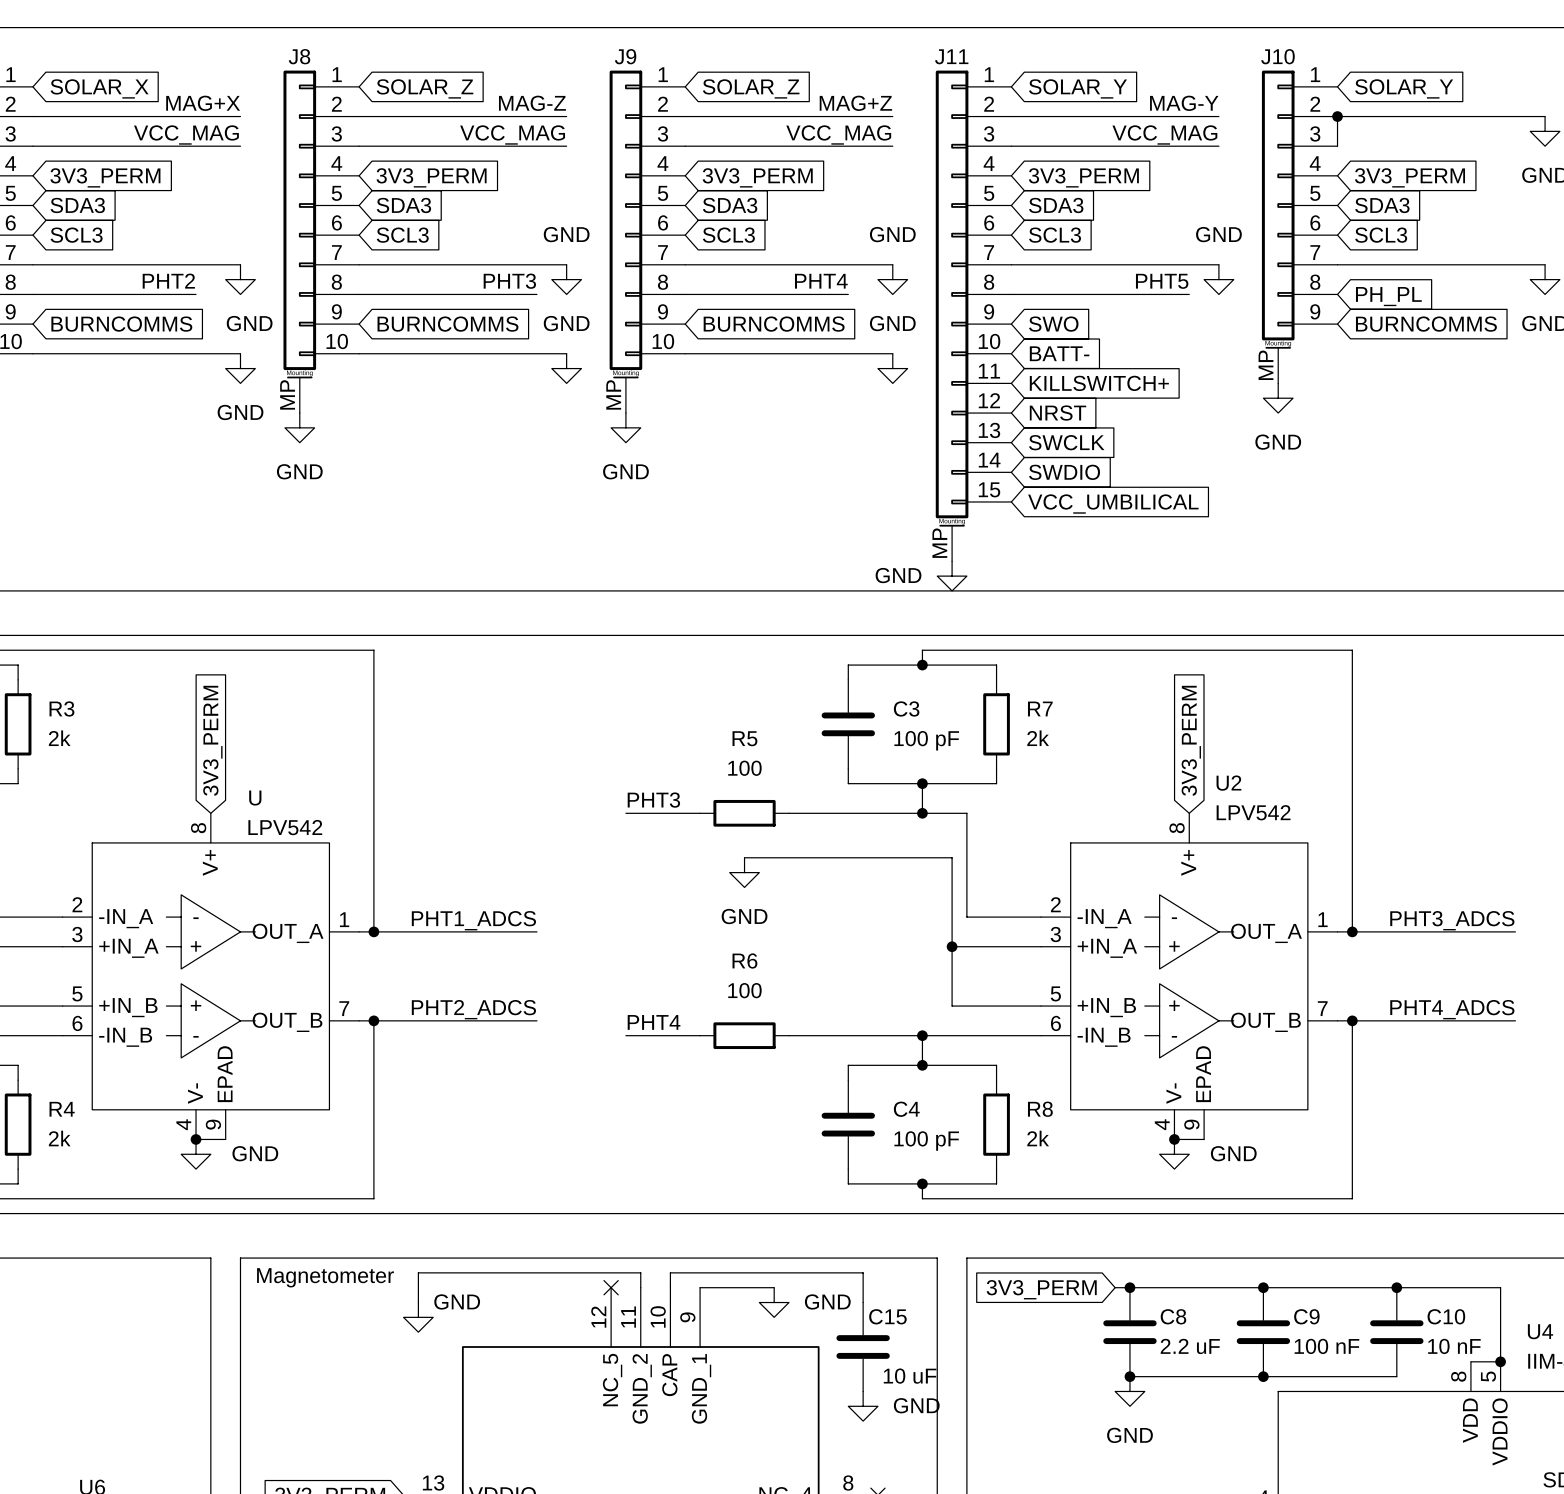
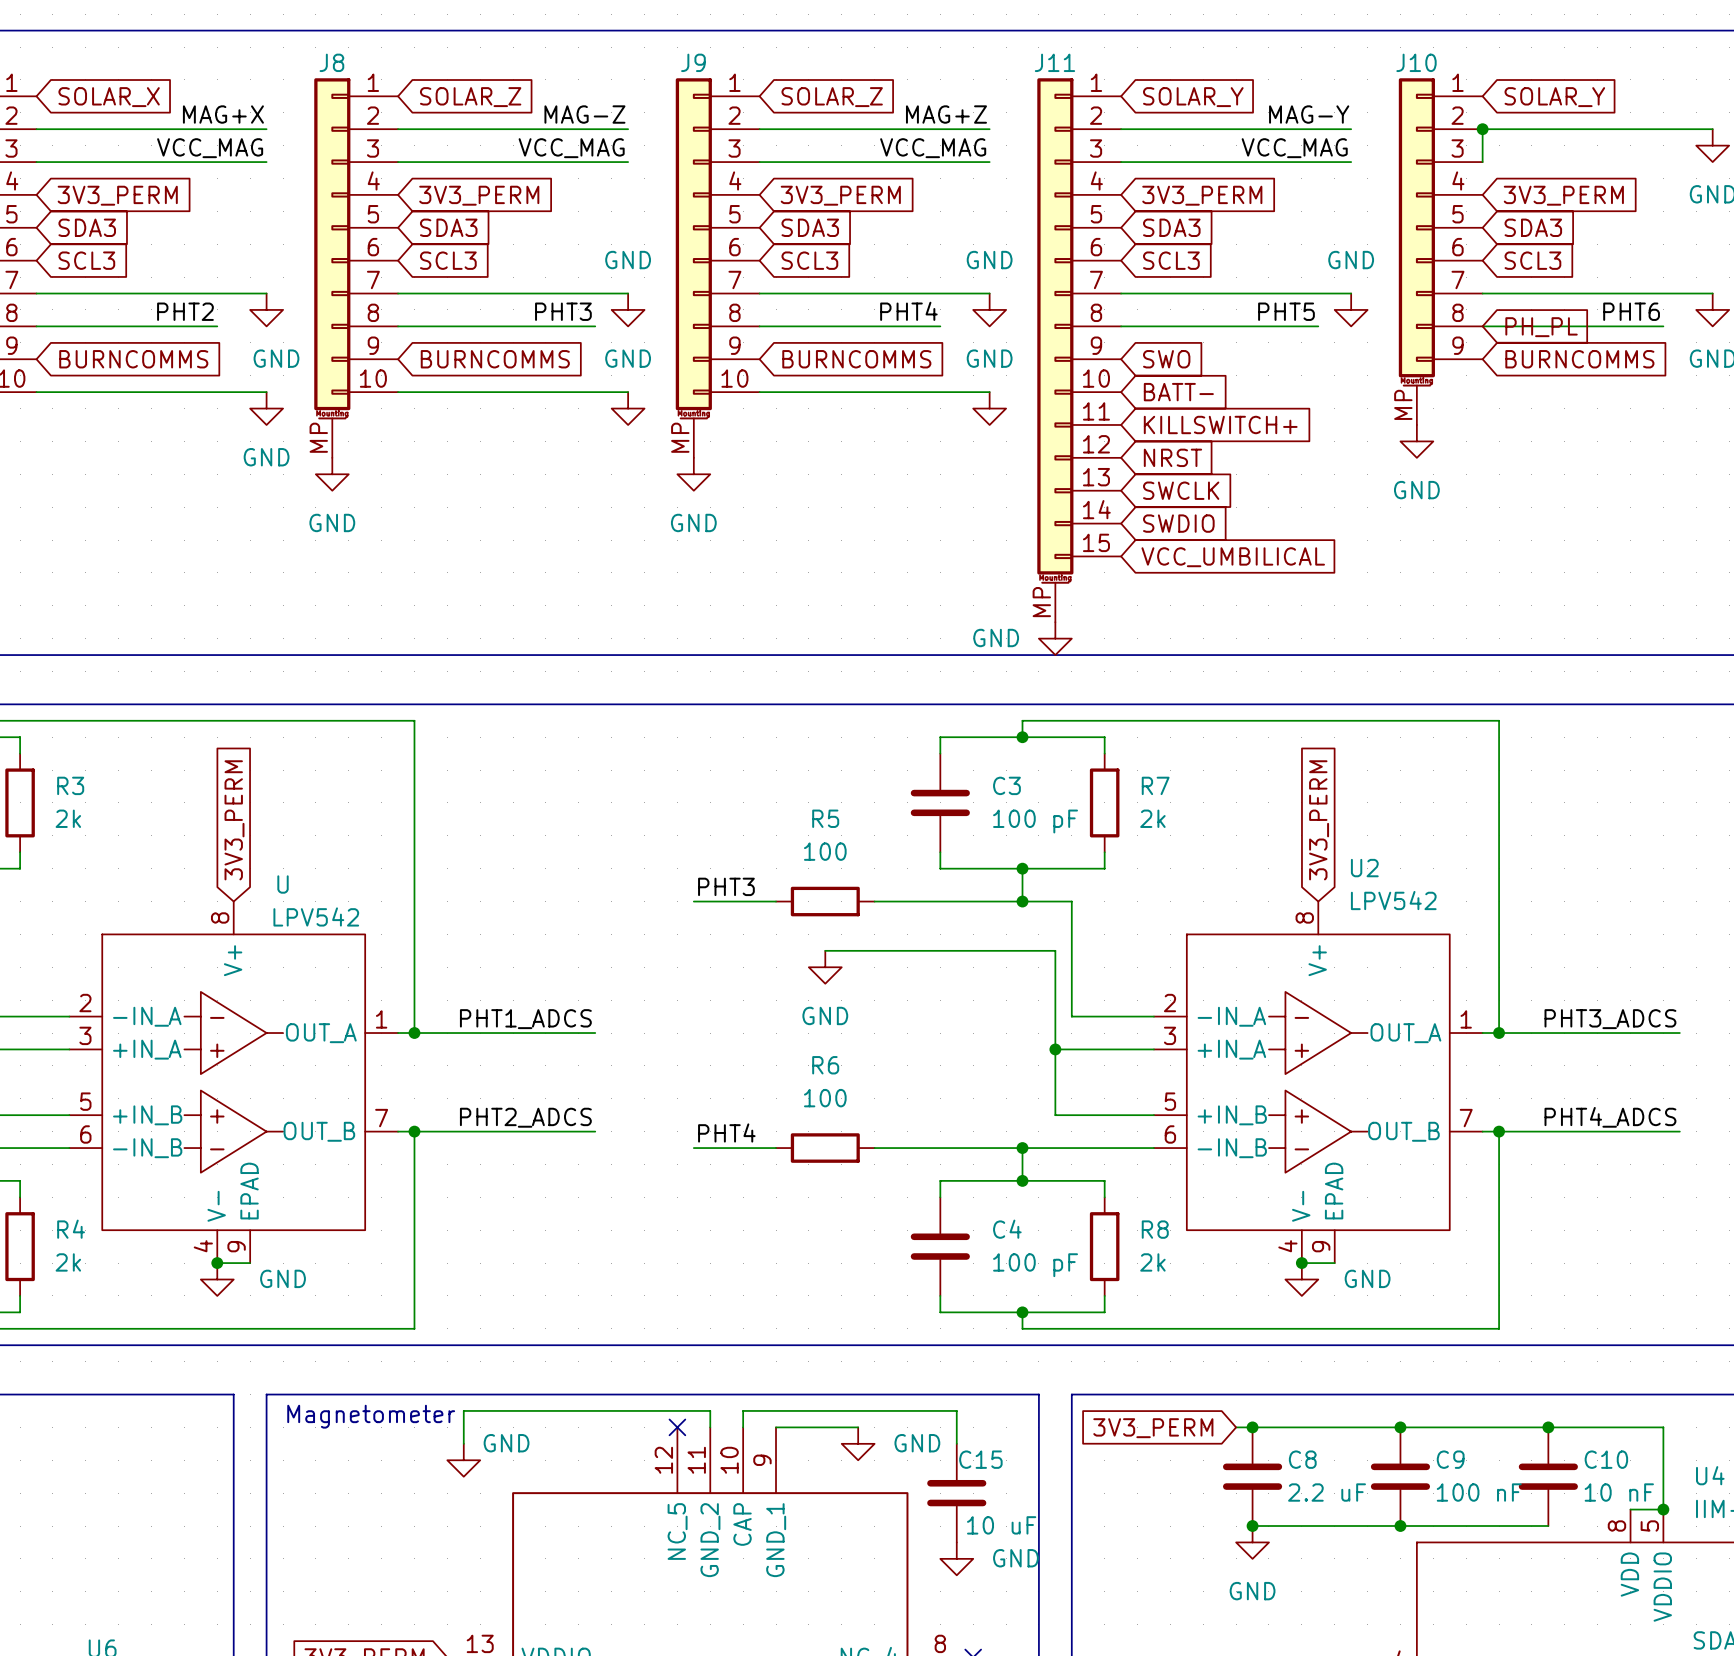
label: none -> PHT6 (1631, 311)
wire: none -> (1482, 326) (1663, 326)

